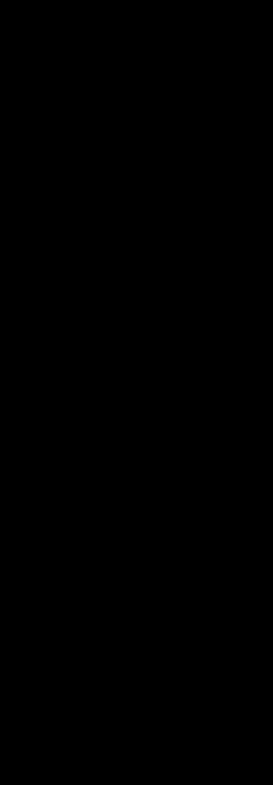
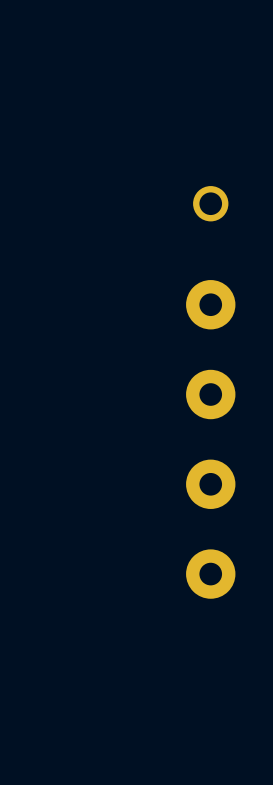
part: none -> (210, 203)
part: none -> (210, 439)

